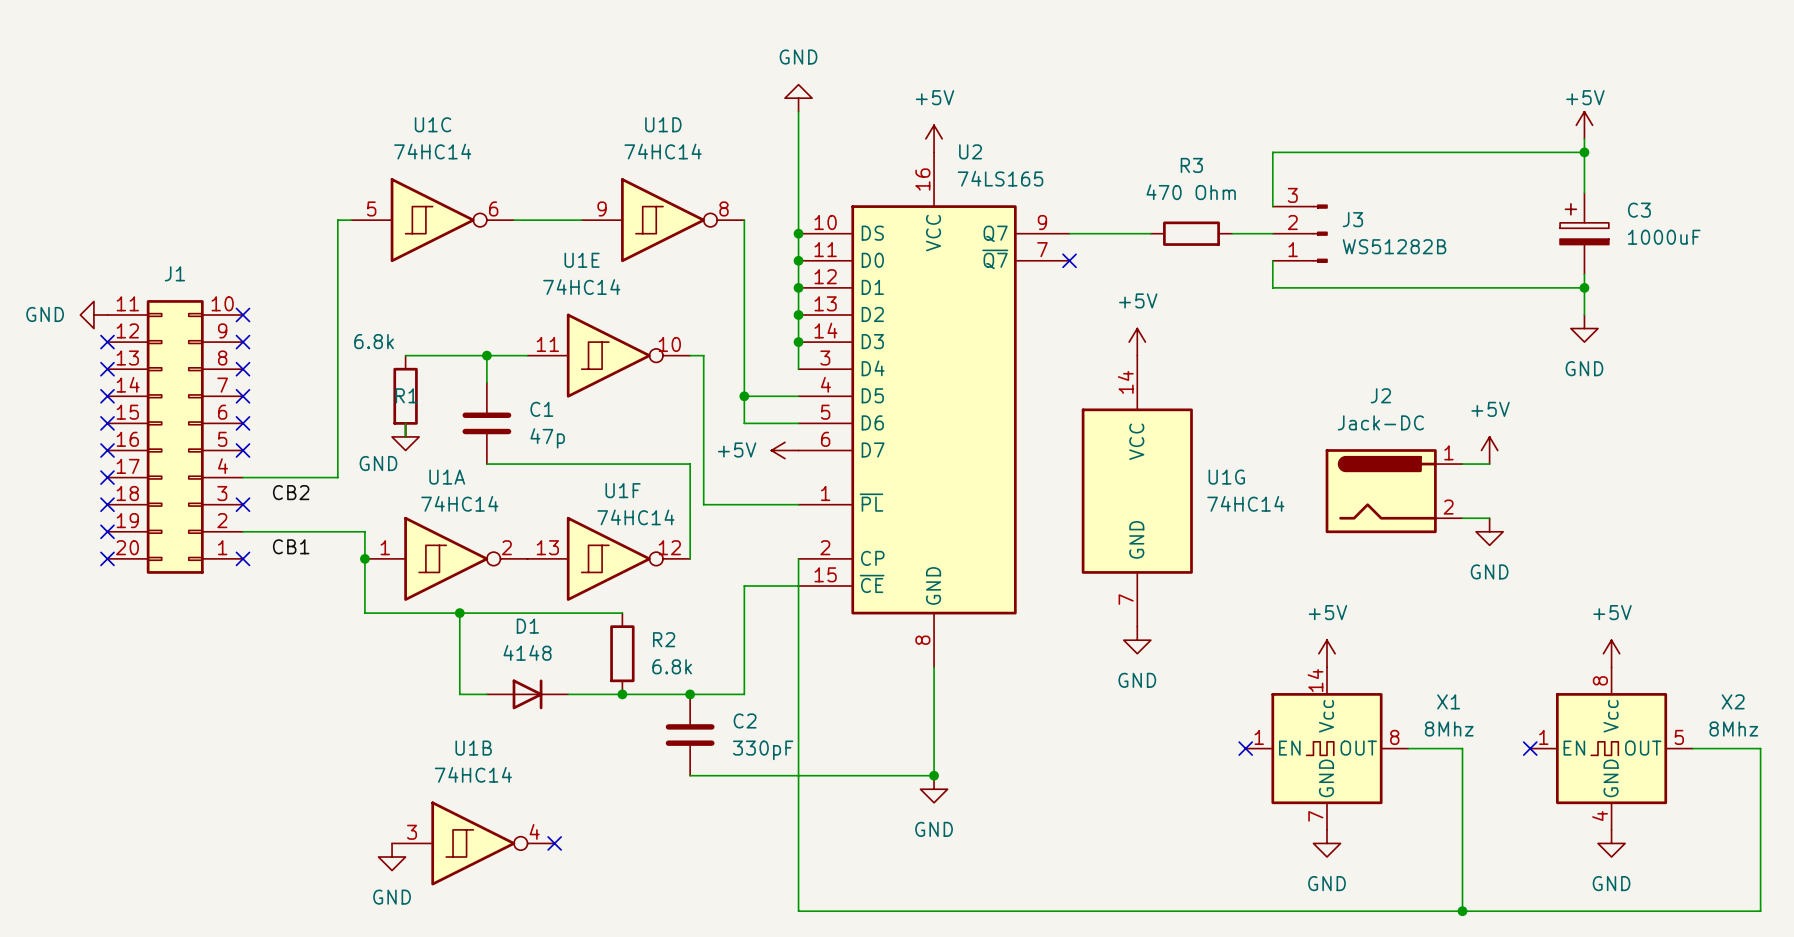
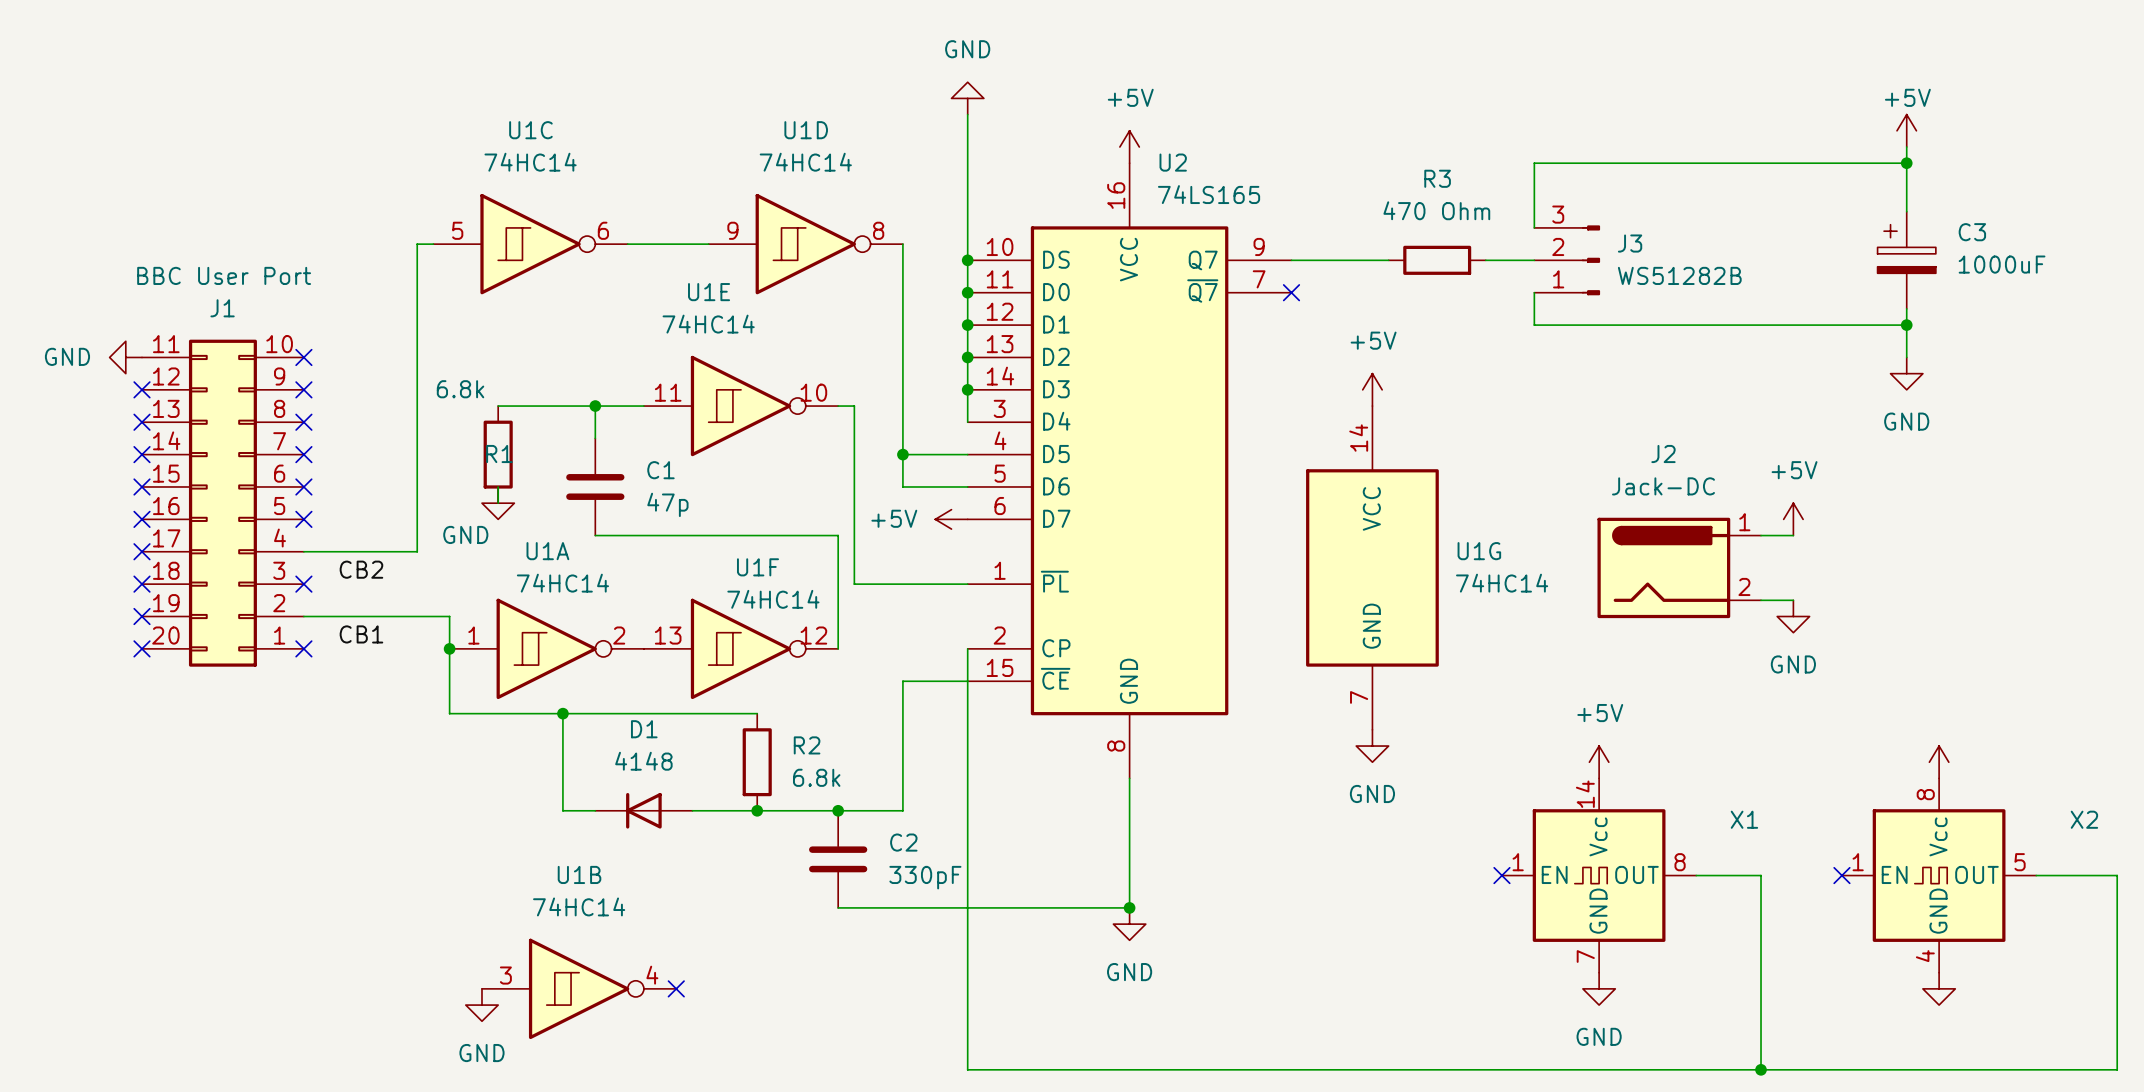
J1 value: none -> BBC User Port (224, 275)
power symbol text: +5V (1612, 612) -> none
D1 rotation: 0° (527, 694) -> 180° (643, 810)
X1 value: 8Mhz (1449, 728) -> none
X2 value: 8Mhz (1733, 728) -> none
power symbol text: GND (1611, 883) -> none

